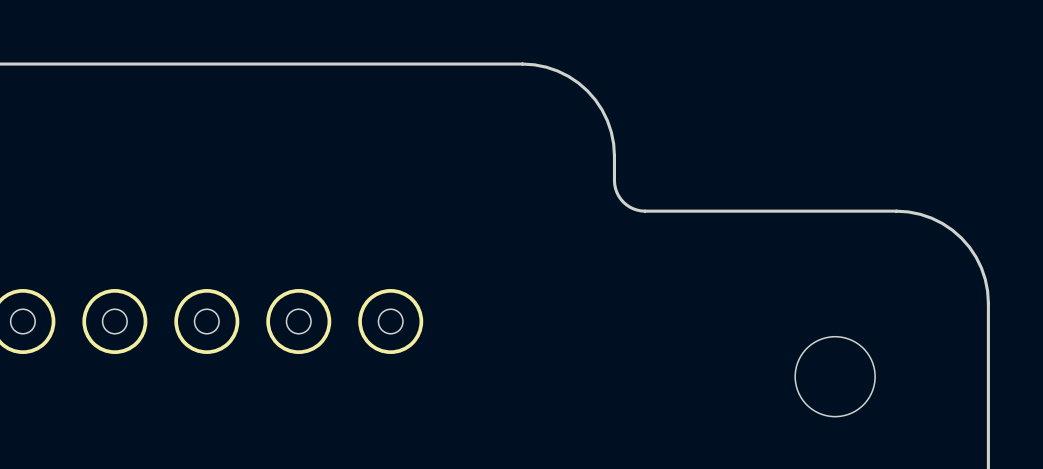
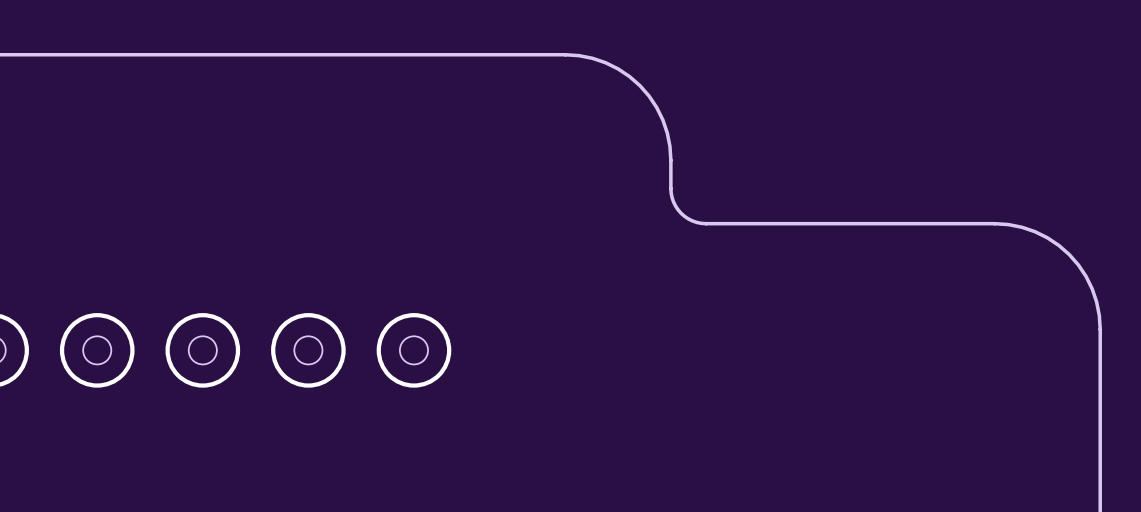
round board edge: [794, 335, 876, 418] -> none

